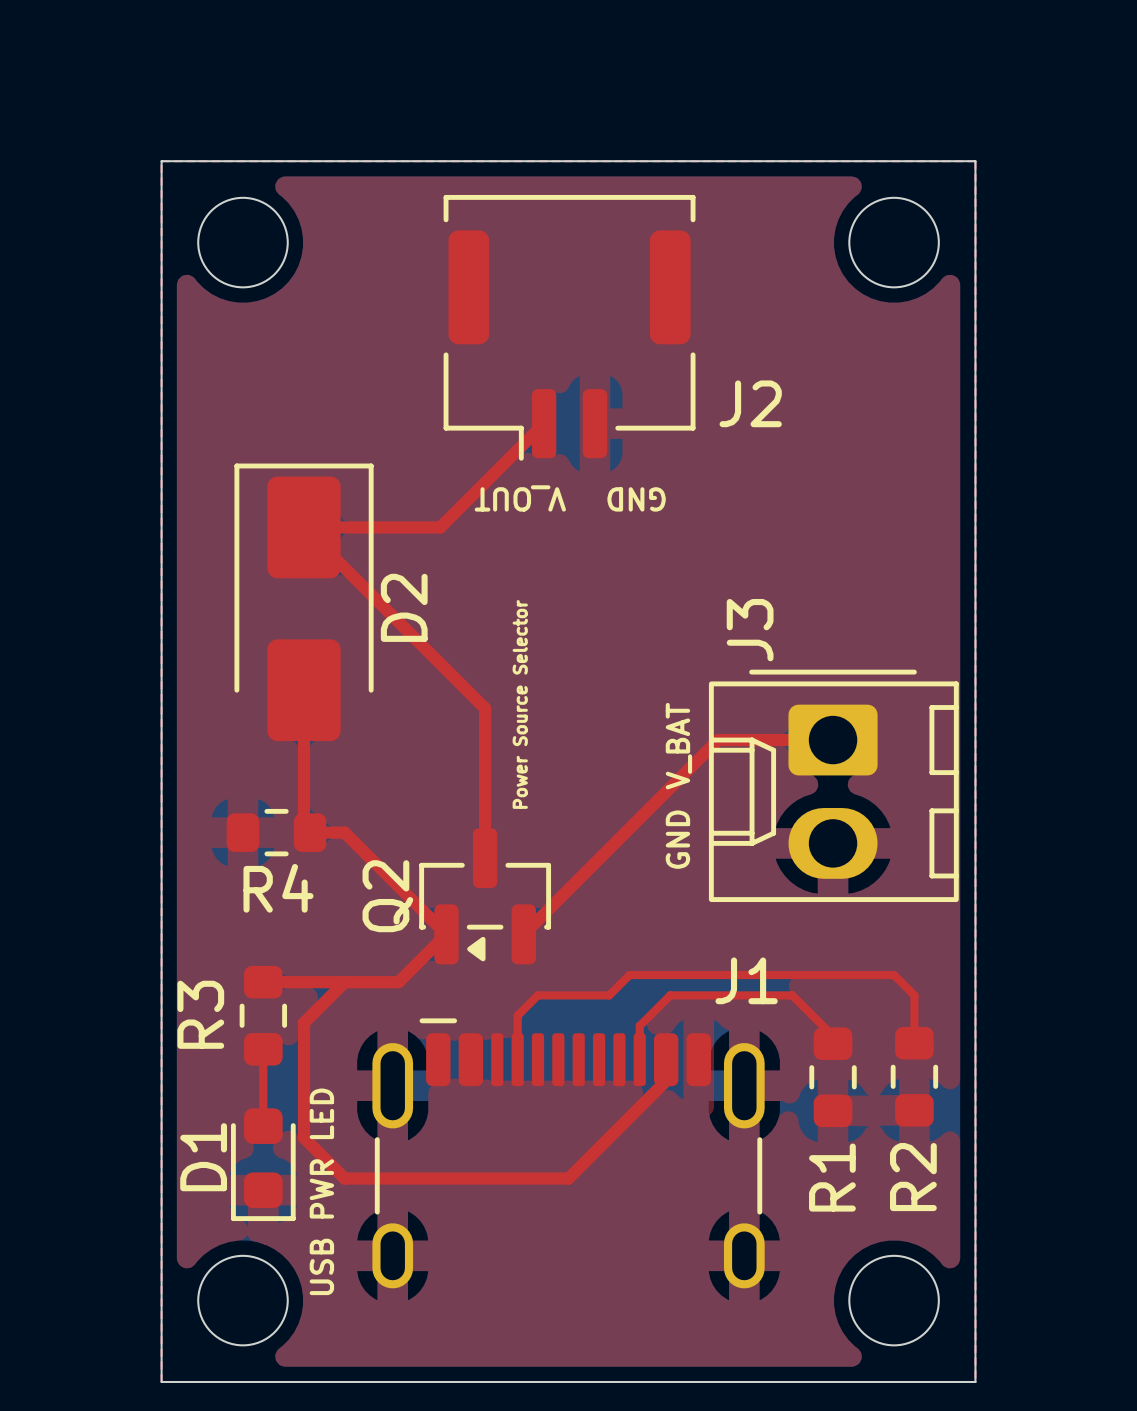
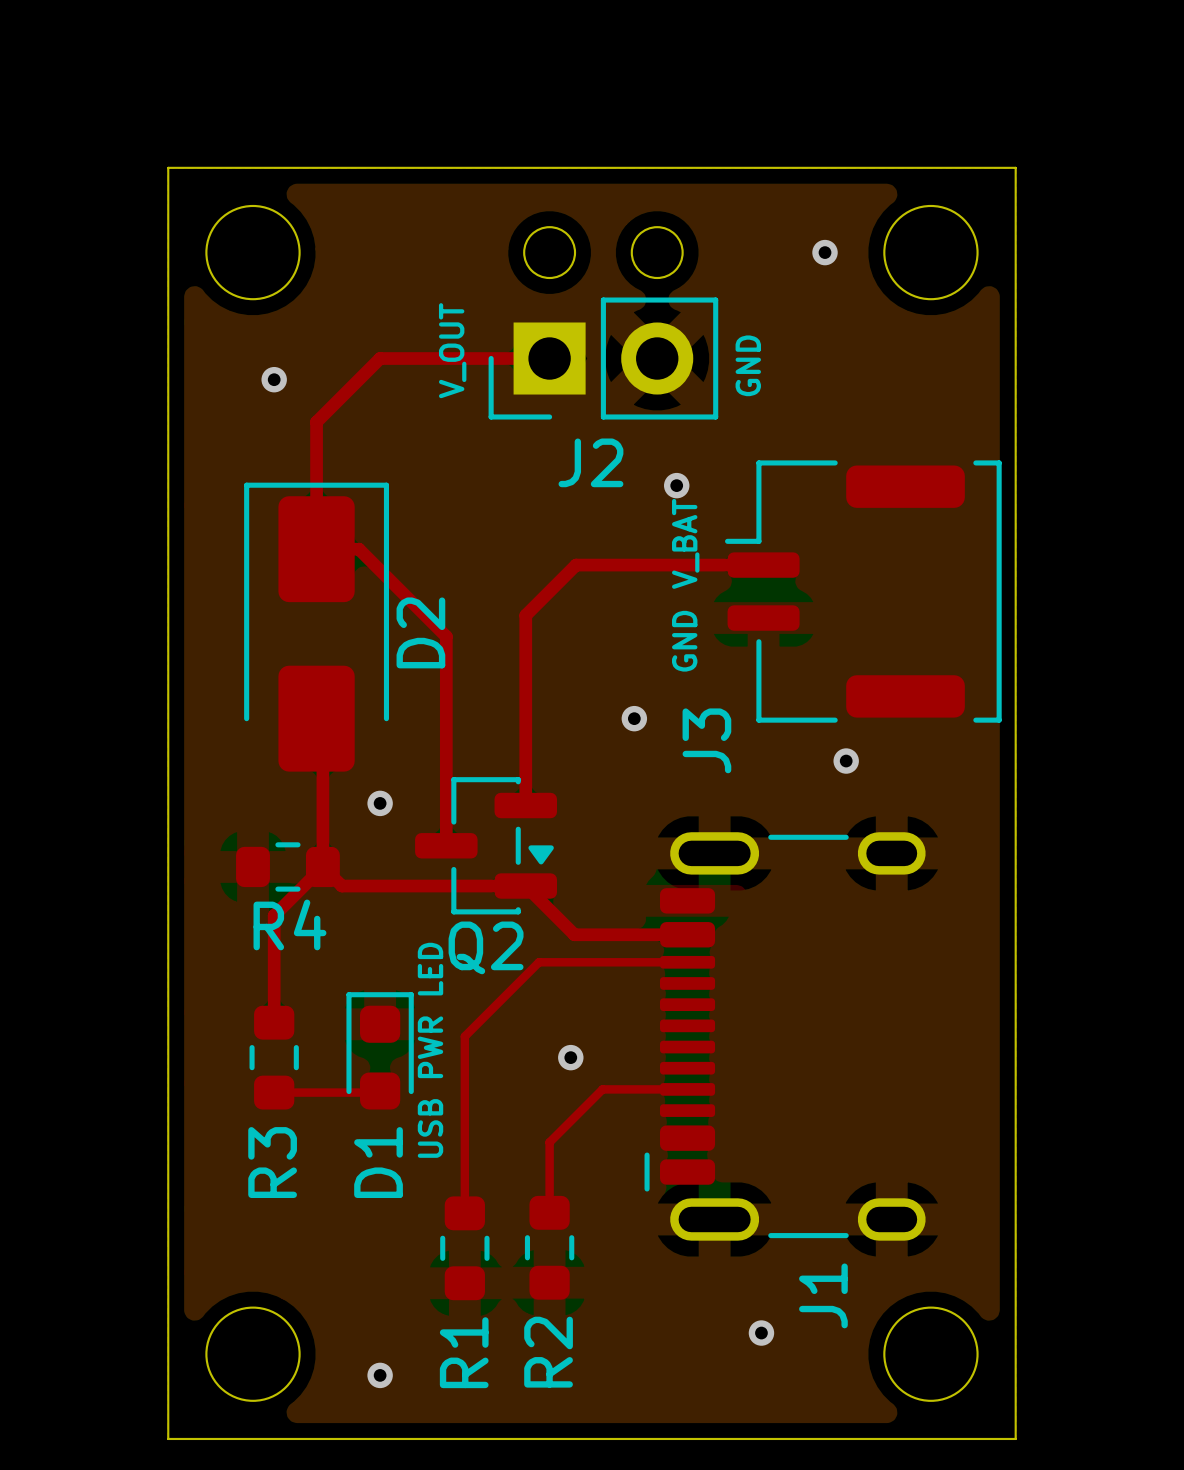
J2 footprint: [443, 194, 696, 461] -> [488, 297, 719, 420]
round board edge: none -> [523, 226, 577, 280]
round board edge: none -> [630, 226, 684, 280]
via: none -> (825, 252)
text: none -> GND (748, 365)
via: none -> (274, 379)
J2 name position: J2 (750, 403) -> J2 (590, 462)
top track: (544, 423) (440, 527) (344, 527) -> (446, 845) (446, 636) (358, 549)
via: none -> (676, 485)
text rotation: 0° (520, 498) -> 90° clockwise (452, 350)
text position: V_OUT (520, 498) -> V_OUT (452, 350)
text: GND (636, 499) -> none
top track: (304, 527) (485, 708) (485, 858) -> (316, 549) (316, 422) (380, 358) (549, 358)
top track: none -> (763, 565) (576, 565) (525, 615) (525, 805)
text: none -> GND (684, 641)
J3 name position: J3 (750, 630) -> J3 (706, 740)
J3 footprint: [708, 669, 959, 903] -> [725, 460, 1002, 723]
top track: (304, 690) (304, 826) (310, 832) (344, 832) (446, 934) (398, 982) (263, 982) -> (322, 866) (274, 915) (274, 1022)
top track: none -> (316, 718) (322, 725) (322, 866)
via: none -> (634, 718)
text: Power Source Selector (520, 704) -> none
via: none -> (846, 761)
top track: (833, 740) (718, 740) (523, 934) -> none
text position: V_BAT (678, 746) -> V_BAT (685, 543)
via: none -> (380, 803)
top track: none -> (322, 866) (341, 886) (525, 886) (574, 934) (687, 934)
text: GND (677, 839) -> none
Q2 rotation: 0° (485, 896) -> 90° counterclockwise (486, 845)
Q2 position: (485, 896) -> (486, 845)
top track: none -> (687, 962) (539, 962) (464, 1036) (464, 1213)
J1 name position: J1 (746, 980) -> J1 (823, 1295)
top track: (344, 982) (304, 1022) (304, 1137) (344, 1178) (568, 1178) (666, 1080) (666, 1059) -> none
R3 name position: R3 (200, 1014) -> R3 (272, 1162)
via: none -> (570, 1057)
top track: (833, 1043) (833, 1036) (792, 995) (670, 995) (639, 1025) (639, 1059) -> none
top track: (914, 1043) (914, 995) (894, 975) (629, 975) (609, 995) (537, 995) (517, 1015) (517, 1059) -> none
top track: none -> (687, 1089) (602, 1089) (549, 1142) (549, 1212)
top track: (263, 1049) (263, 1126) -> (274, 1092) (378, 1092) (380, 1090)
R2 position: (914, 1076) -> (549, 1247)
R1 position: (833, 1077) -> (464, 1248)
J1 rotation: 0° (568, 1153) -> 90° counterclockwise (785, 1036)
J1 position: (568, 1153) -> (785, 1036)
D1 name position: D1 (203, 1157) -> D1 (378, 1162)
D1 rotation: 0° (263, 1164) -> 180° (380, 1050)
D1 position: (263, 1164) -> (380, 1050)
text position: USB PWR LED (321, 1191) -> USB PWR LED (430, 1050)
via: none -> (761, 1333)
via: none -> (380, 1375)

